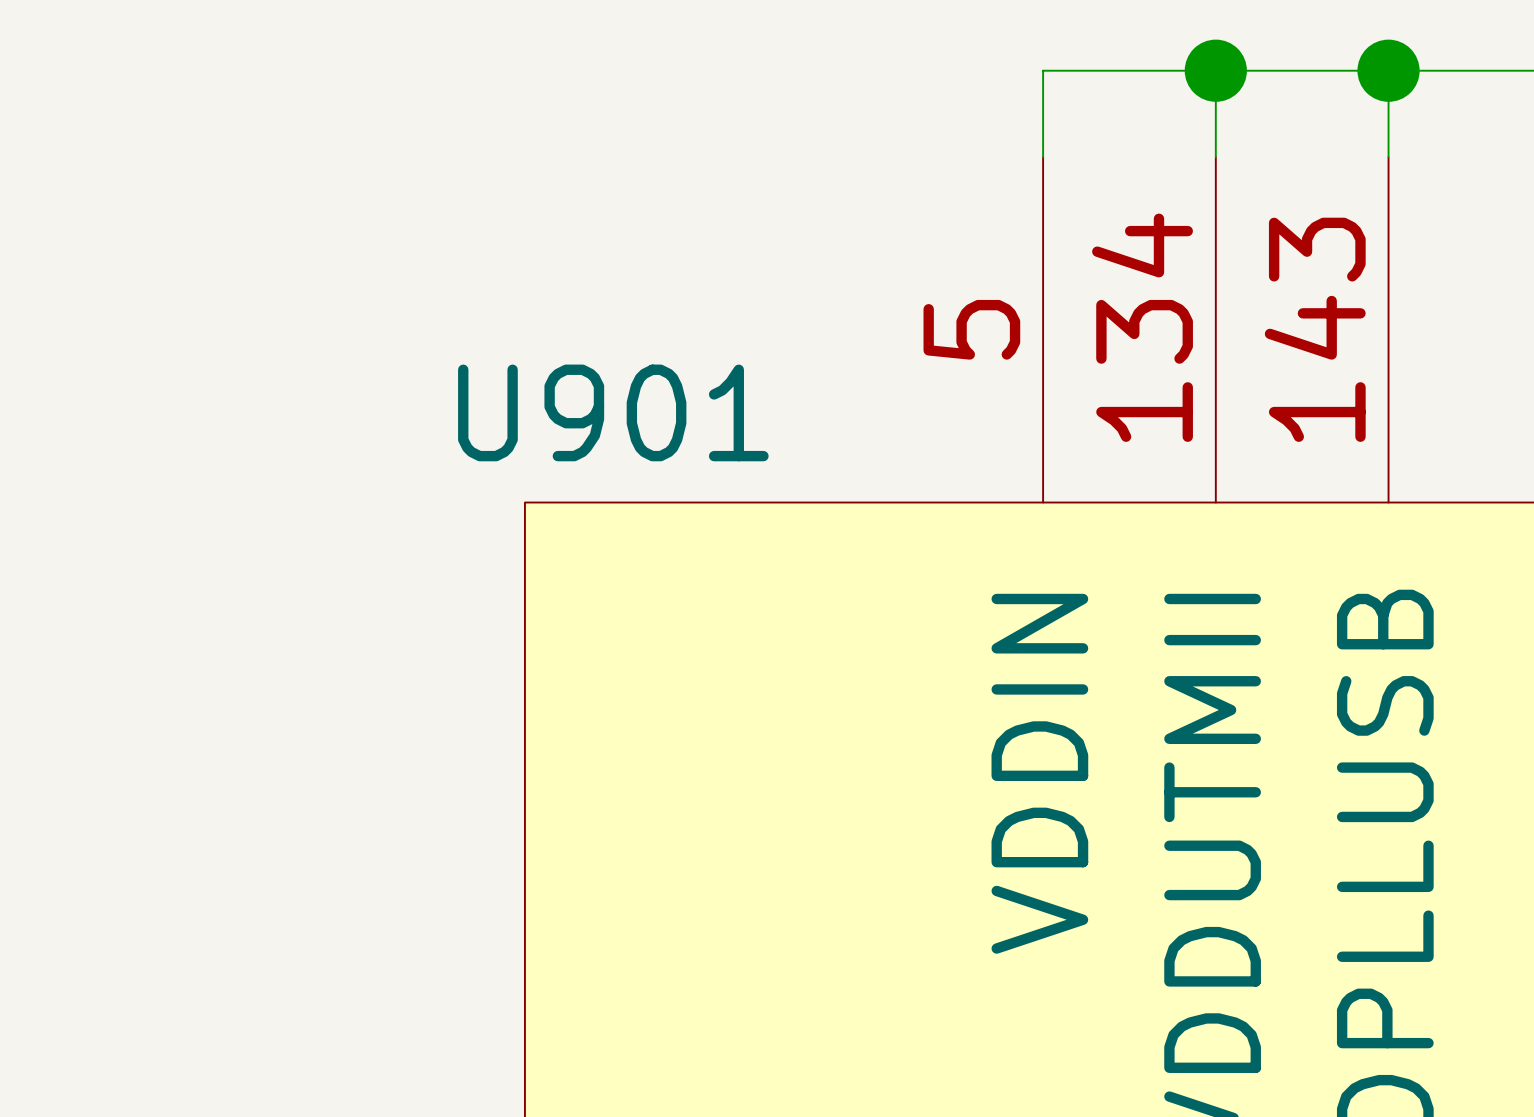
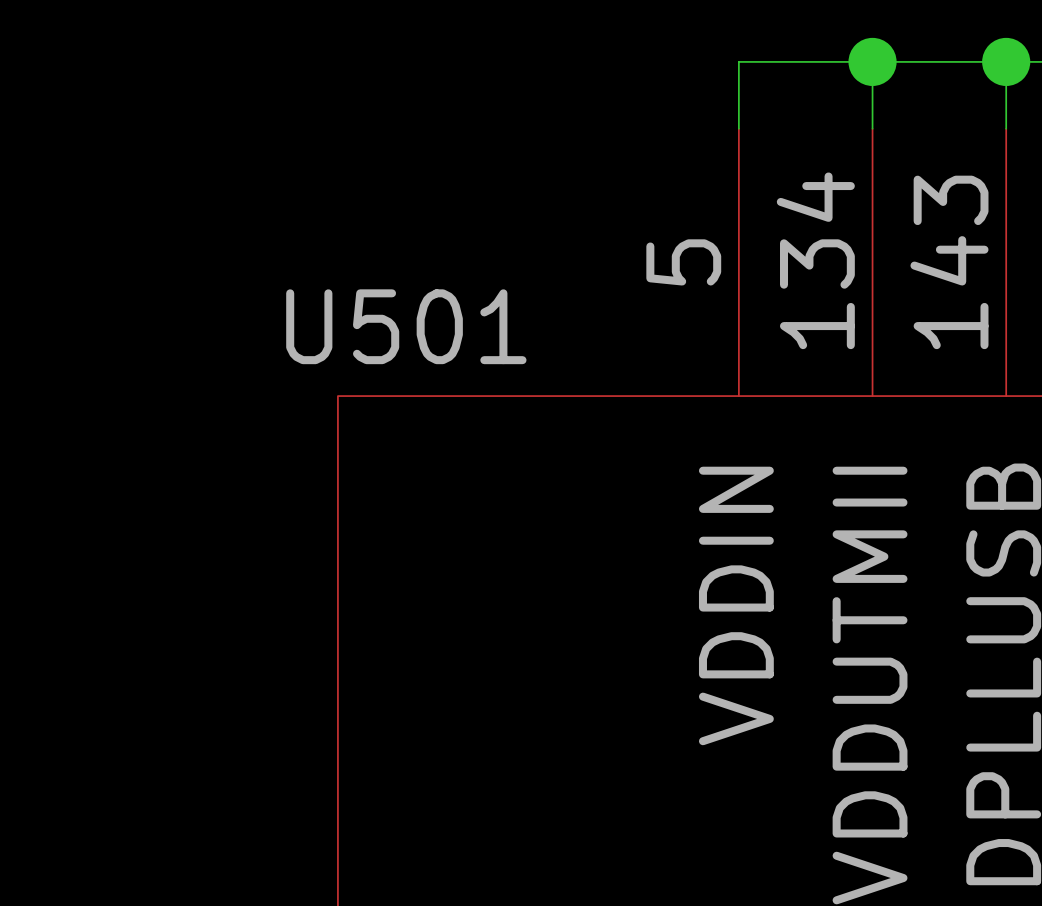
U901 name: U901 (613, 412) -> U501 (406, 326)

